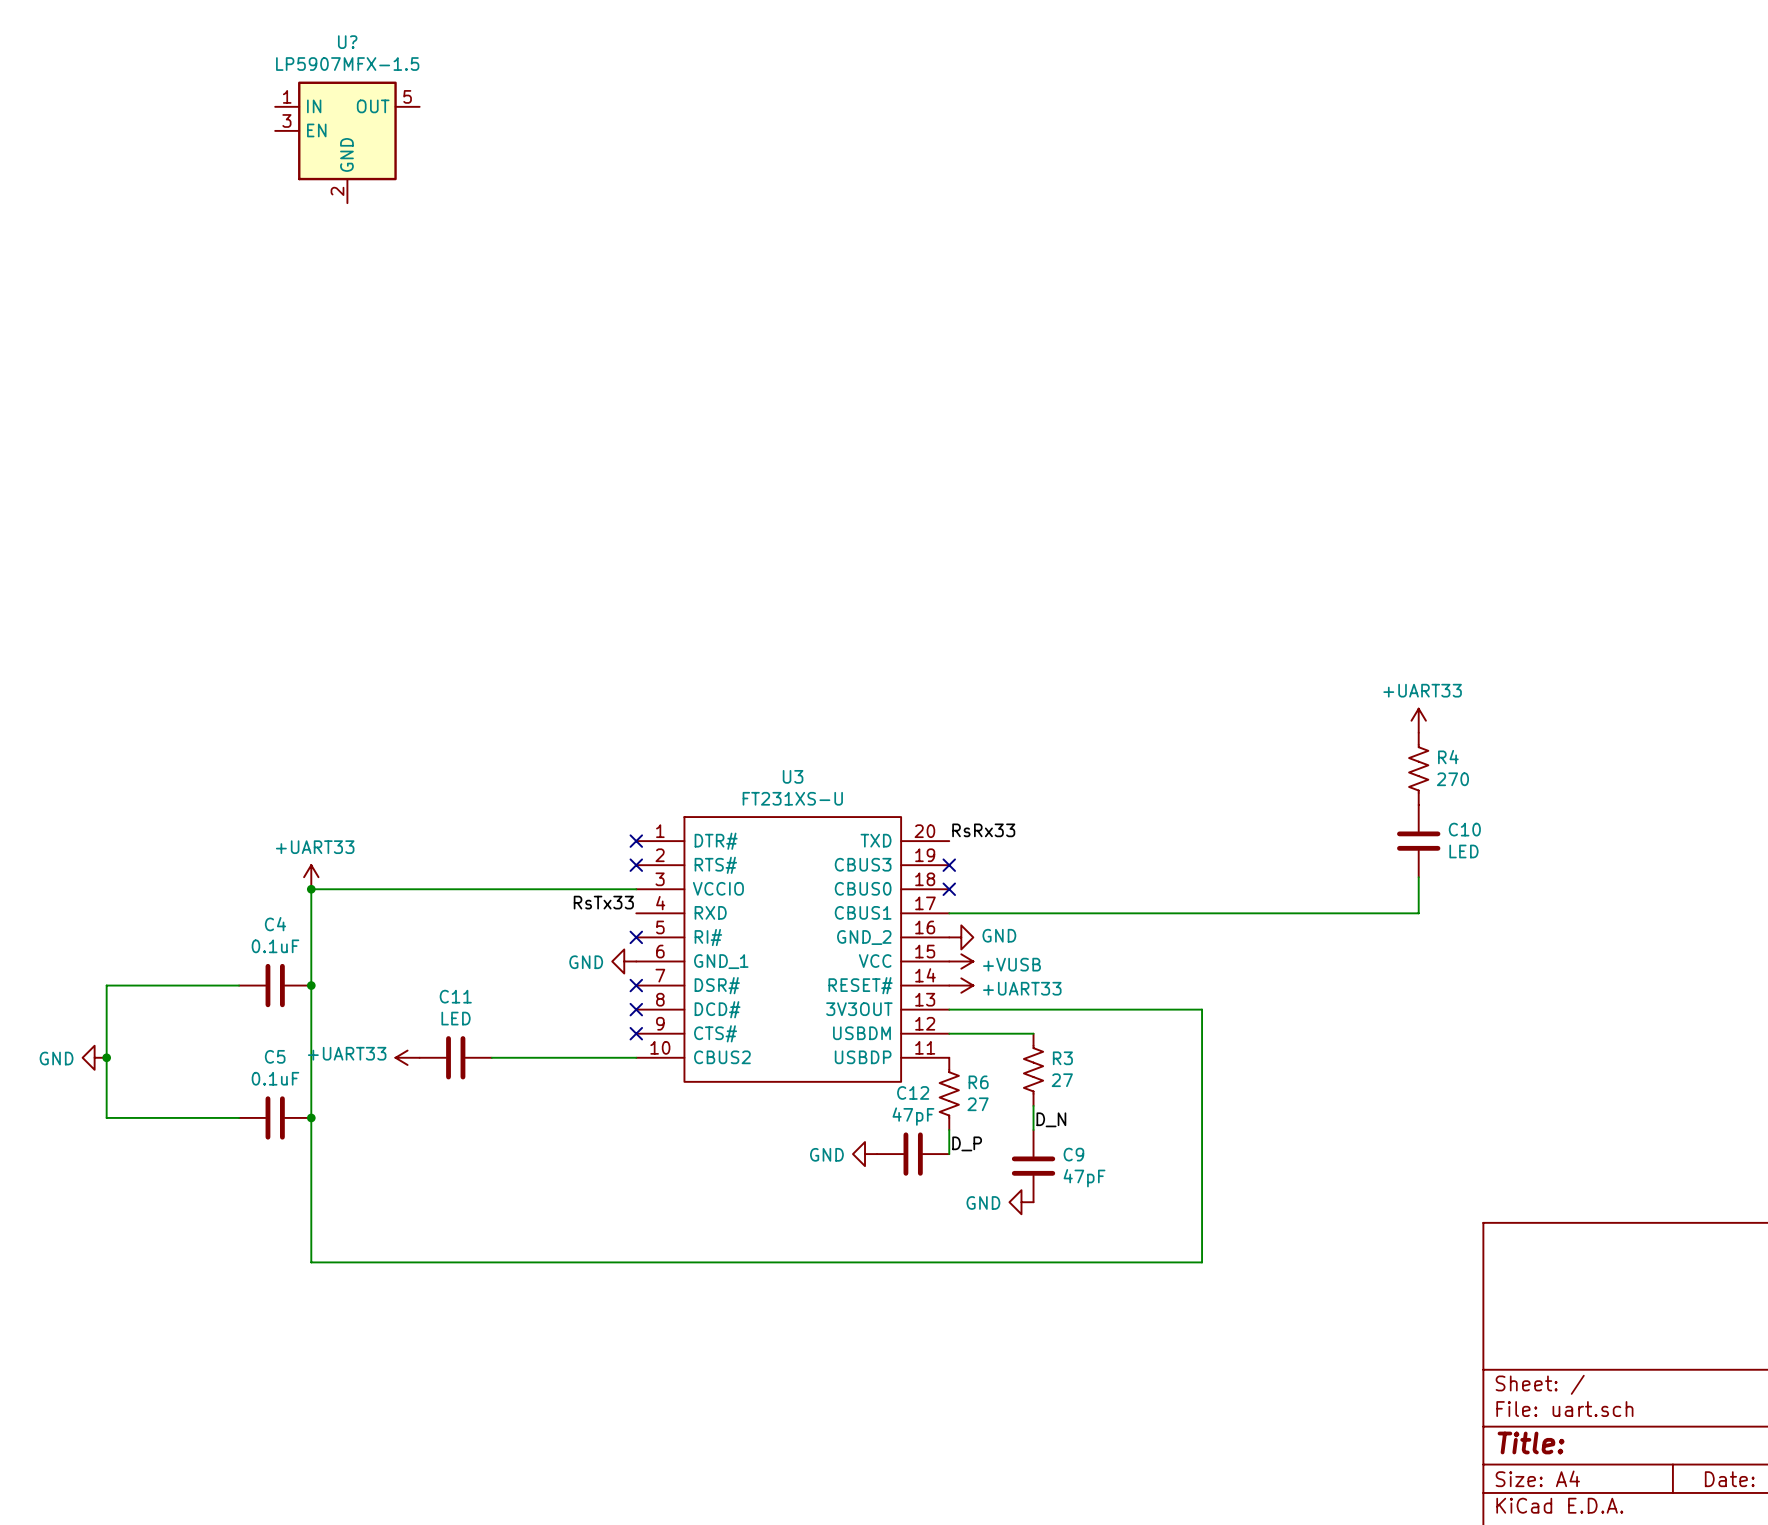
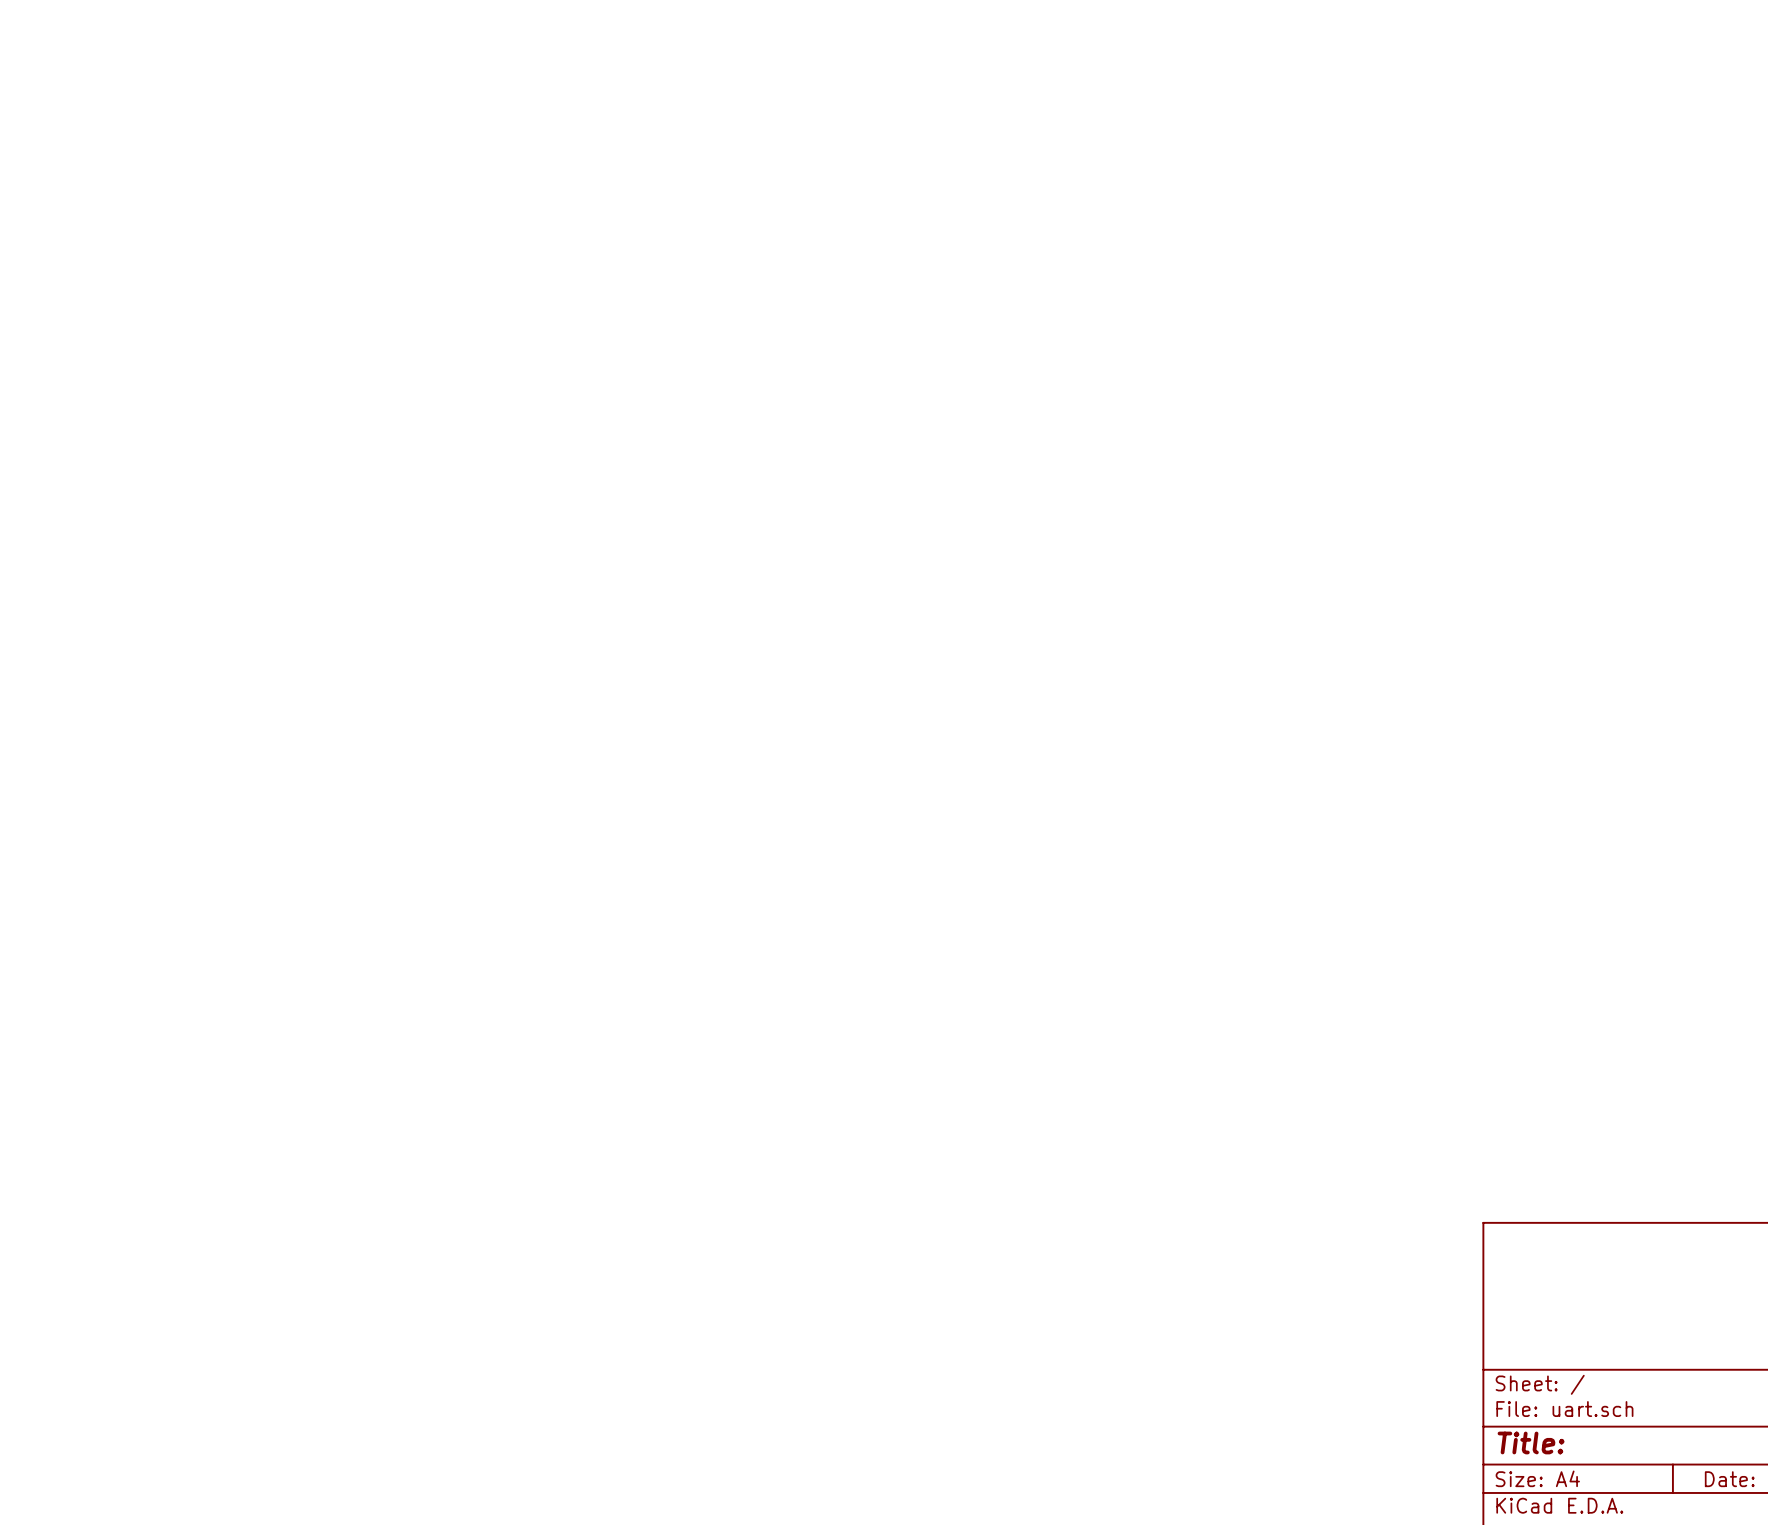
U?: LP5907MFX-1.5 (347, 142) -> none
power symbol: +UART33 (1418, 720) -> none
R4: 270 (1418, 768) -> none
label: RsRx33 (983, 830) -> none
no-connect mark: (636, 841) -> none
C10: LED (1418, 841) -> none
no-connect mark: (636, 865) -> none
no-connect mark: (949, 865) -> none
power symbol: +UART33 (311, 877) -> none
wire: (1418, 877) (1418, 913) (949, 913) -> none
junction: (311, 889) -> none
wire: (636, 889) (311, 889) (311, 1262) (1202, 1262) (1202, 1009) (949, 1009) -> none
no-connect mark: (949, 889) -> none
label: RsTx33 (603, 902) -> none
no-connect mark: (636, 937) -> none
power symbol: GND (961, 937) -> none
U3: FT231XS-U (792, 949) -> none
power symbol: GND (624, 961) -> none
power symbol: +VUSB (961, 961) -> none
wire: (239, 985) (106, 985) (106, 1117) (239, 1117) -> none
C4: 0.1uF (275, 985) -> none
junction: (311, 985) -> none
no-connect mark: (636, 985) -> none
power symbol: +UART33 (961, 985) -> none
no-connect mark: (636, 1009) -> none
no-connect mark: (636, 1033) -> none
wire: (949, 1033) (1033, 1033) -> none
power symbol: GND (94, 1057) -> none
junction: (106, 1057) -> none
power symbol: +UART33 (407, 1057) -> none
C11: LED (455, 1057) -> none
wire: (491, 1057) (636, 1057) -> none
R3: 27 (1033, 1069) -> none
R6: 27 (949, 1093) -> none
wire: (1033, 1105) (1033, 1130) -> none
C5: 0.1uF (275, 1117) -> none
junction: (311, 1117) -> none
label: D_N (1051, 1119) -> none
wire: (949, 1130) (949, 1154) -> none
label: D_P (967, 1143) -> none
power symbol: GND (865, 1154) -> none
C12: 47pF (913, 1154) -> none
C9: 47pF (1033, 1166) -> none
power symbol: GND (1021, 1202) -> none

